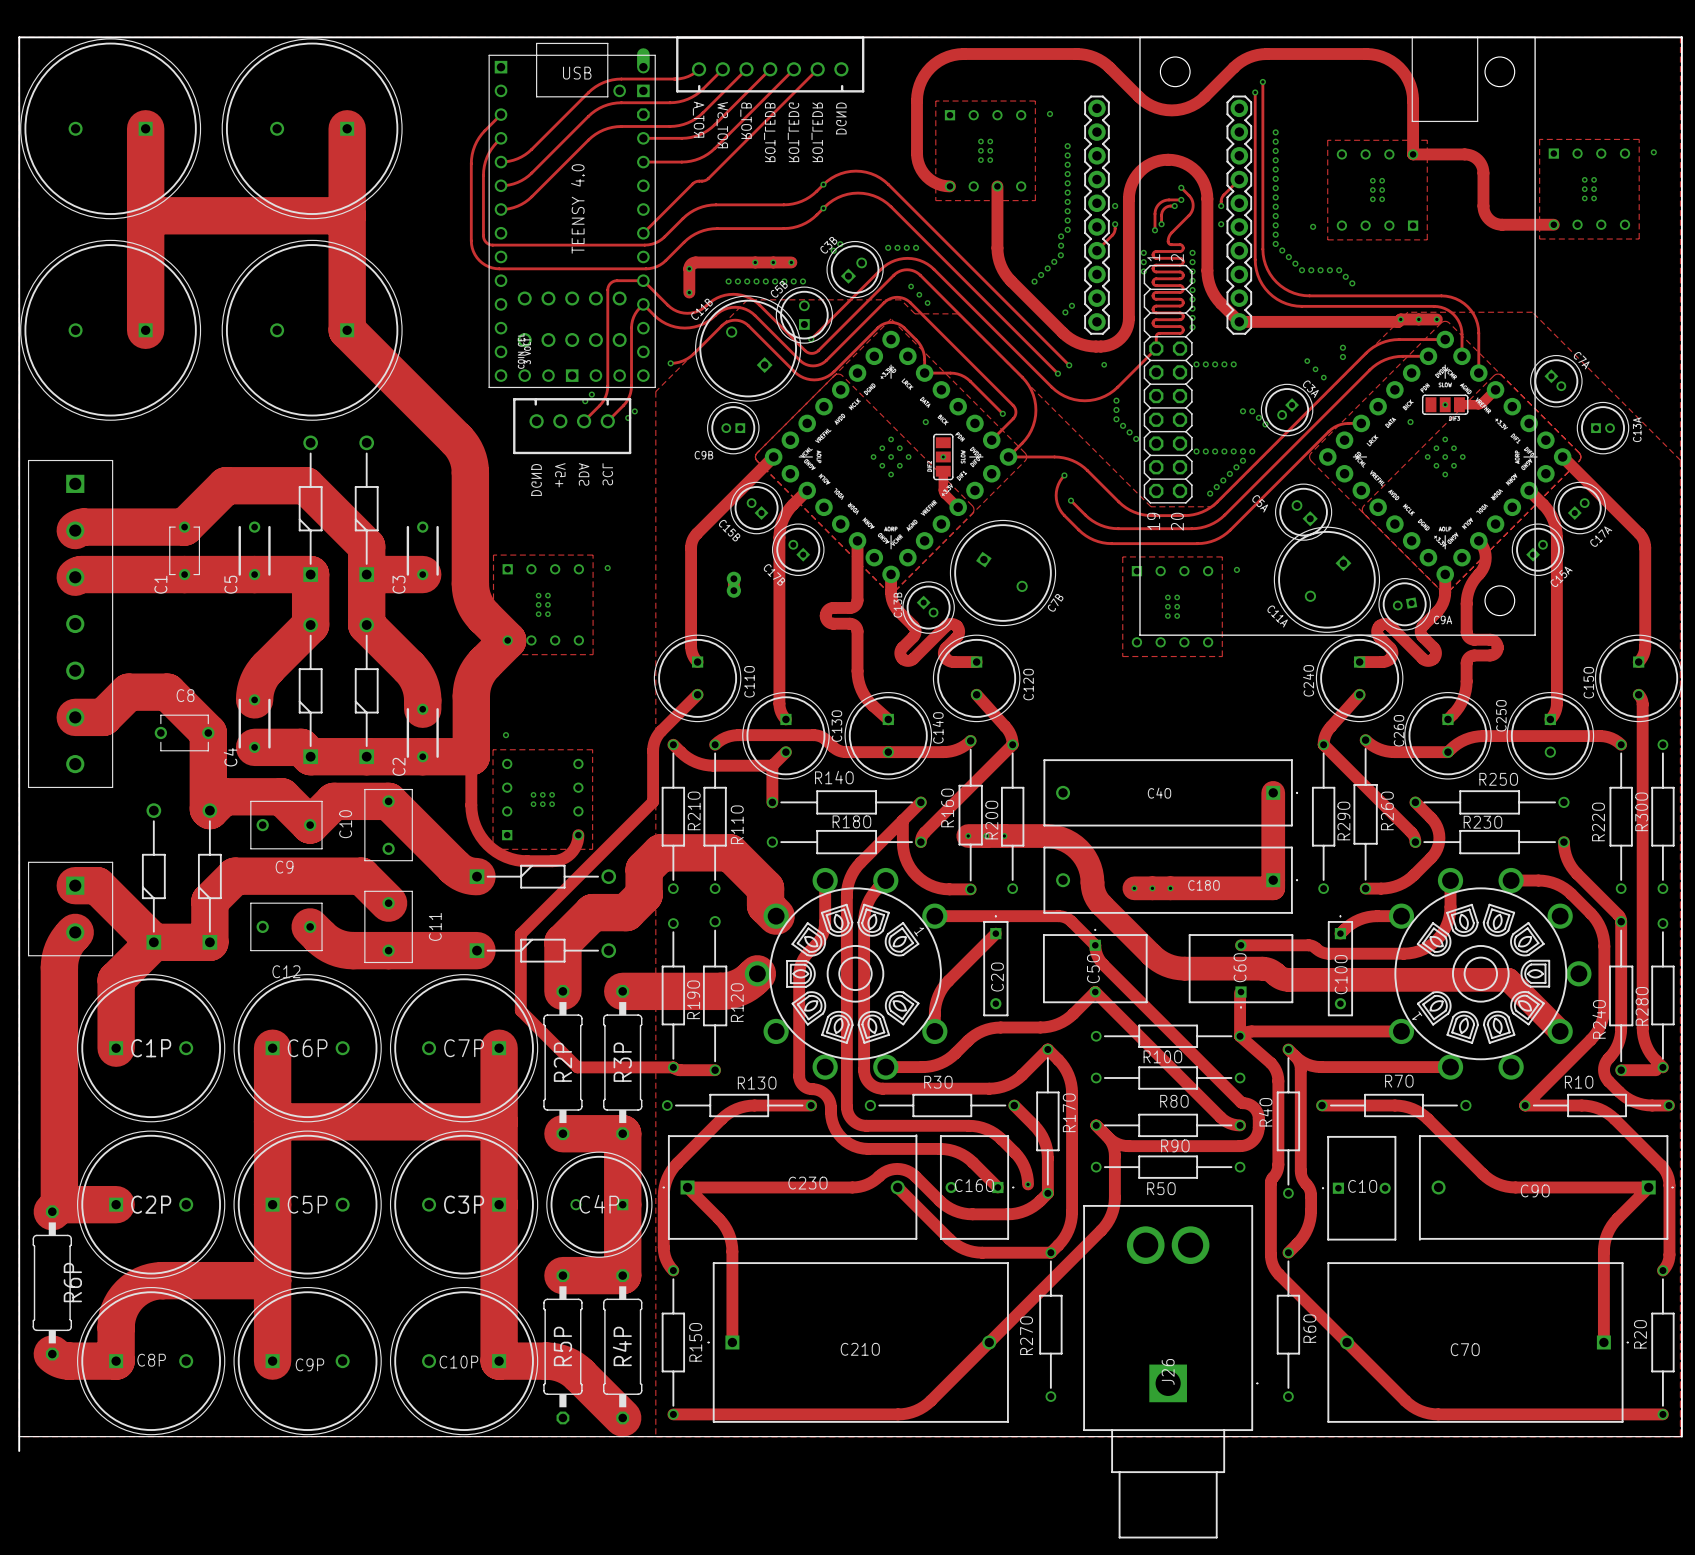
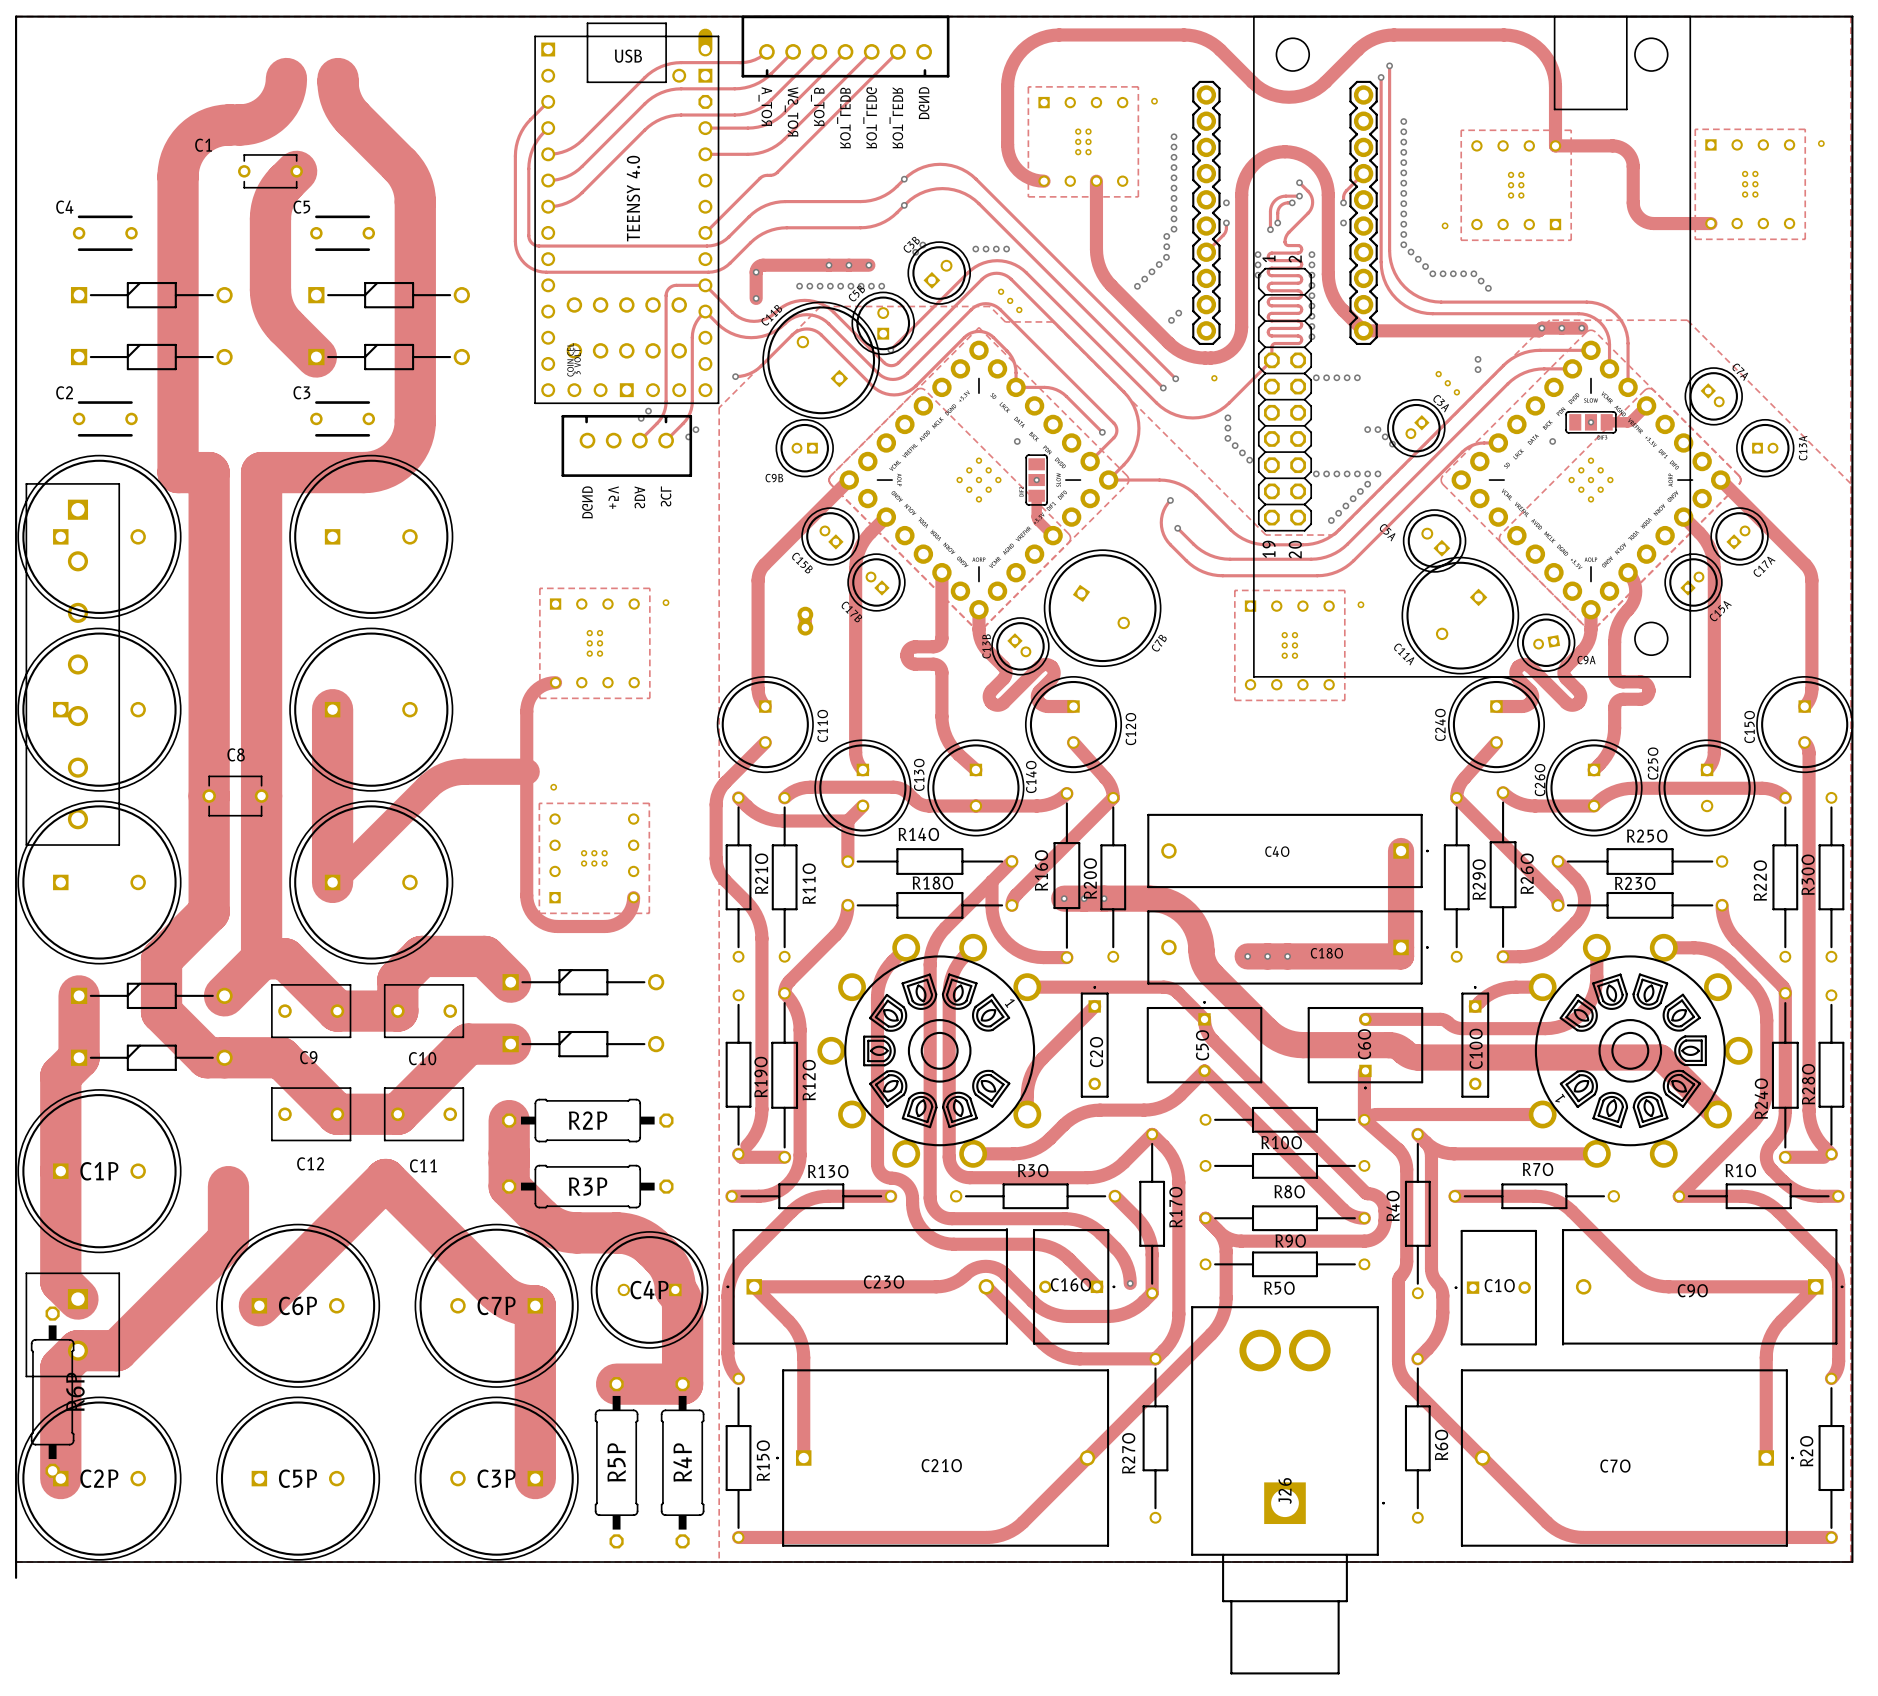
track: none -> (286, 78) (281, 98) (268, 114) (250, 123) (218, 126) (202, 132) (185, 149) (178, 170) (178, 472) (209, 472) (209, 911) (161, 959) (161, 1012) (207, 1057) (280, 1057) (337, 1114) (397, 1114) (467, 1044) (510, 1044)
track: none -> (338, 78) (340, 96) (346, 110) (403, 169) (414, 191) (414, 426) (410, 443) (404, 453) (391, 464) (380, 469) (363, 472) (261, 472) (261, 958)
part: (110, 128) -> none
track: (145, 128) (145, 330) -> none
part: (312, 128) -> none
track: (347, 128) (347, 330) (456, 439) (464, 450) (470, 472) (471, 592) (480, 613) (507, 640) (481, 666) (473, 682) (471, 696) (471, 756) -> none
track: none -> (296, 171) (279, 190) (271, 208) (270, 294) (279, 318) (316, 357)
track: (145, 215) (347, 215) -> none
part: none -> (151, 295)
part: none -> (389, 295)
part: (110, 330) -> none
part: (312, 330) -> none
part: none -> (151, 357)
part: none -> (389, 357)
part: none -> (99, 536)
part: (310, 508) -> none
part: none -> (371, 536)
part: (366, 508) -> none
track: (75, 530) (83, 527) (184, 527) (225, 485) (305, 485) (366, 546) (366, 624) (414, 674) (421, 691) (422, 709) -> none
C1 rotation: 0° (184, 550) -> 90° clockwise (270, 171)
C1 position: (184, 550) -> (270, 171)
C5 rotation: 0° (254, 550) -> 90° clockwise (342, 233)
C5 position: (254, 550) -> (342, 233)
C3 rotation: 0° (422, 550) -> 90° clockwise (342, 418)
C3 position: (422, 550) -> (342, 418)
track: (366, 574) (422, 574) -> none
track: (75, 577) (81, 574) (310, 574) (310, 624) (264, 671) (256, 686) (254, 699) -> none
C1 name position: C1 (160, 584) -> C1 (203, 145)
part: none -> (99, 709)
track: none -> (332, 709) (332, 882) (428, 786) (440, 777) (459, 772) (526, 771)
part: none -> (371, 709)
part: (310, 690) -> none
part: (366, 690) -> none
track: (75, 717) (103, 717) (128, 692) (167, 692) (208, 732) (208, 809) (209, 810) (223, 796) (281, 796) (310, 825) (333, 801) (388, 801) (457, 870) (464, 874) (477, 876) -> none
C4 rotation: 0° (254, 723) -> 90° clockwise (105, 233)
C4 position: (254, 723) -> (105, 233)
C8 position: (184, 732) -> (235, 796)
C2 rotation: 0° (422, 732) -> 90° clockwise (105, 418)
C2 position: (422, 732) -> (105, 418)
track: (254, 747) (301, 747) (310, 756) (471, 756) -> none
track: (471, 756) (471, 810) (477, 831) (487, 844) (500, 854) (516, 860) (527, 861) -> (555, 682) (544, 684) (535, 691) (526, 707) (526, 899) (533, 914) (542, 922) (553, 926) (577, 926)
track: (653, 799) (520, 934) (520, 1010) (577, 1067) (673, 1067) (680, 1070) -> (716, 858) (718, 870) (722, 877) (753, 909) (761, 933) (761, 1114) (755, 1133) (738, 1154) (741, 1157) (746, 1157)
part: none -> (99, 882)
part: none -> (371, 882)
C10 name position: C10 (345, 824) -> C10 (422, 1058)
C9 position: (286, 825) -> (311, 1011)
C10 rotation: 0° (388, 825) -> 90° clockwise (424, 1011)
C10 position: (388, 825) -> (424, 1011)
track: none -> (847, 905) (846, 917) (840, 928) (789, 980) (784, 990) (796, 1010) (799, 1025) (800, 1155) (796, 1170) (788, 1184) (774, 1193) (764, 1195) (731, 1196)
part: (153, 876) -> none
part: (209, 876) -> none
part: (542, 876) -> none
track: (825, 880) (824, 930) (818, 942) (803, 958) (799, 975) -> (906, 947) (889, 965) (879, 982) (877, 997) (877, 1052)
track: (75, 885) (97, 885) (153, 942) -> none
track: none -> (261, 958) (224, 995)
track: none -> (261, 958) (285, 958) (337, 1011) (397, 1011) (397, 980) (421, 956) (484, 956) (510, 982)
track: (388, 903) (361, 876) (234, 876) (209, 901) (209, 942) (153, 942) -> none
part: (70, 909) -> none
part: none -> (583, 982)
track: (776, 916) (765, 905) (765, 888) (730, 852) (660, 852) (644, 869) (644, 894) (626, 912) (592, 912) (562, 942) (562, 991) -> none
track: none -> (79, 995) (79, 1057) (60, 1076) (60, 1281) (77, 1299)
part: none -> (151, 995)
C12 position: (286, 926) -> (311, 1114)
track: (310, 926) (327, 942) (348, 950) (477, 950) -> none
C11 rotation: 0° (388, 926) -> 90° clockwise (424, 1114)
C11 position: (388, 926) -> (424, 1114)
track: (75, 932) (64, 945) (59, 963) (59, 1204) (52, 1211) -> none
track: (153, 942) (116, 980) (116, 1048) -> none
part position: (542, 950) -> (583, 1044)
track: (757, 973) (742, 985) (725, 991) (622, 991) -> none
part: none -> (151, 1057)
C1P position: (151, 1048) -> (99, 1171)
track: (272, 1048) (272, 1361) -> none
C6P position: (307, 1048) -> (298, 1305)
C7P position: (464, 1048) -> (496, 1305)
track: (499, 1048) (499, 1361) (551, 1361) (564, 1364) (579, 1374) (622, 1417) -> none
R2P rotation: 0° (562, 1062) -> 90° clockwise (587, 1120)
R3P rotation: 0° (622, 1062) -> 90° clockwise (587, 1186)
track: none -> (385, 1179) (259, 1305)
track: none -> (385, 1179) (500, 1294) (518, 1303) (535, 1305) (535, 1478)
track: none -> (228, 1186) (228, 1239) (117, 1350) (77, 1350) (60, 1367) (60, 1478)
track: (272, 1121) (499, 1121) -> none
track: (562, 1133) (622, 1133) (622, 1206) -> (509, 1120) (509, 1186) (544, 1221) (557, 1228) (571, 1232) (621, 1233) (645, 1241) (661, 1256) (669, 1267) (675, 1289) (680, 1297) (682, 1307)
track: (59, 1204) (116, 1204) -> none
C2P position: (151, 1204) -> (99, 1478)
C5P position: (307, 1204) -> (298, 1478)
C3P position: (464, 1204) -> (496, 1478)
C4P position: (599, 1204) -> (649, 1289)
part: none -> (72, 1324)
track: (272, 1280) (162, 1280) (147, 1283) (129, 1294) (118, 1311) (116, 1327) (116, 1361) (66, 1360) (52, 1354) -> none
C8P: (151, 1361) -> none
C9P: (307, 1361) -> none
C10P: (464, 1361) -> none

